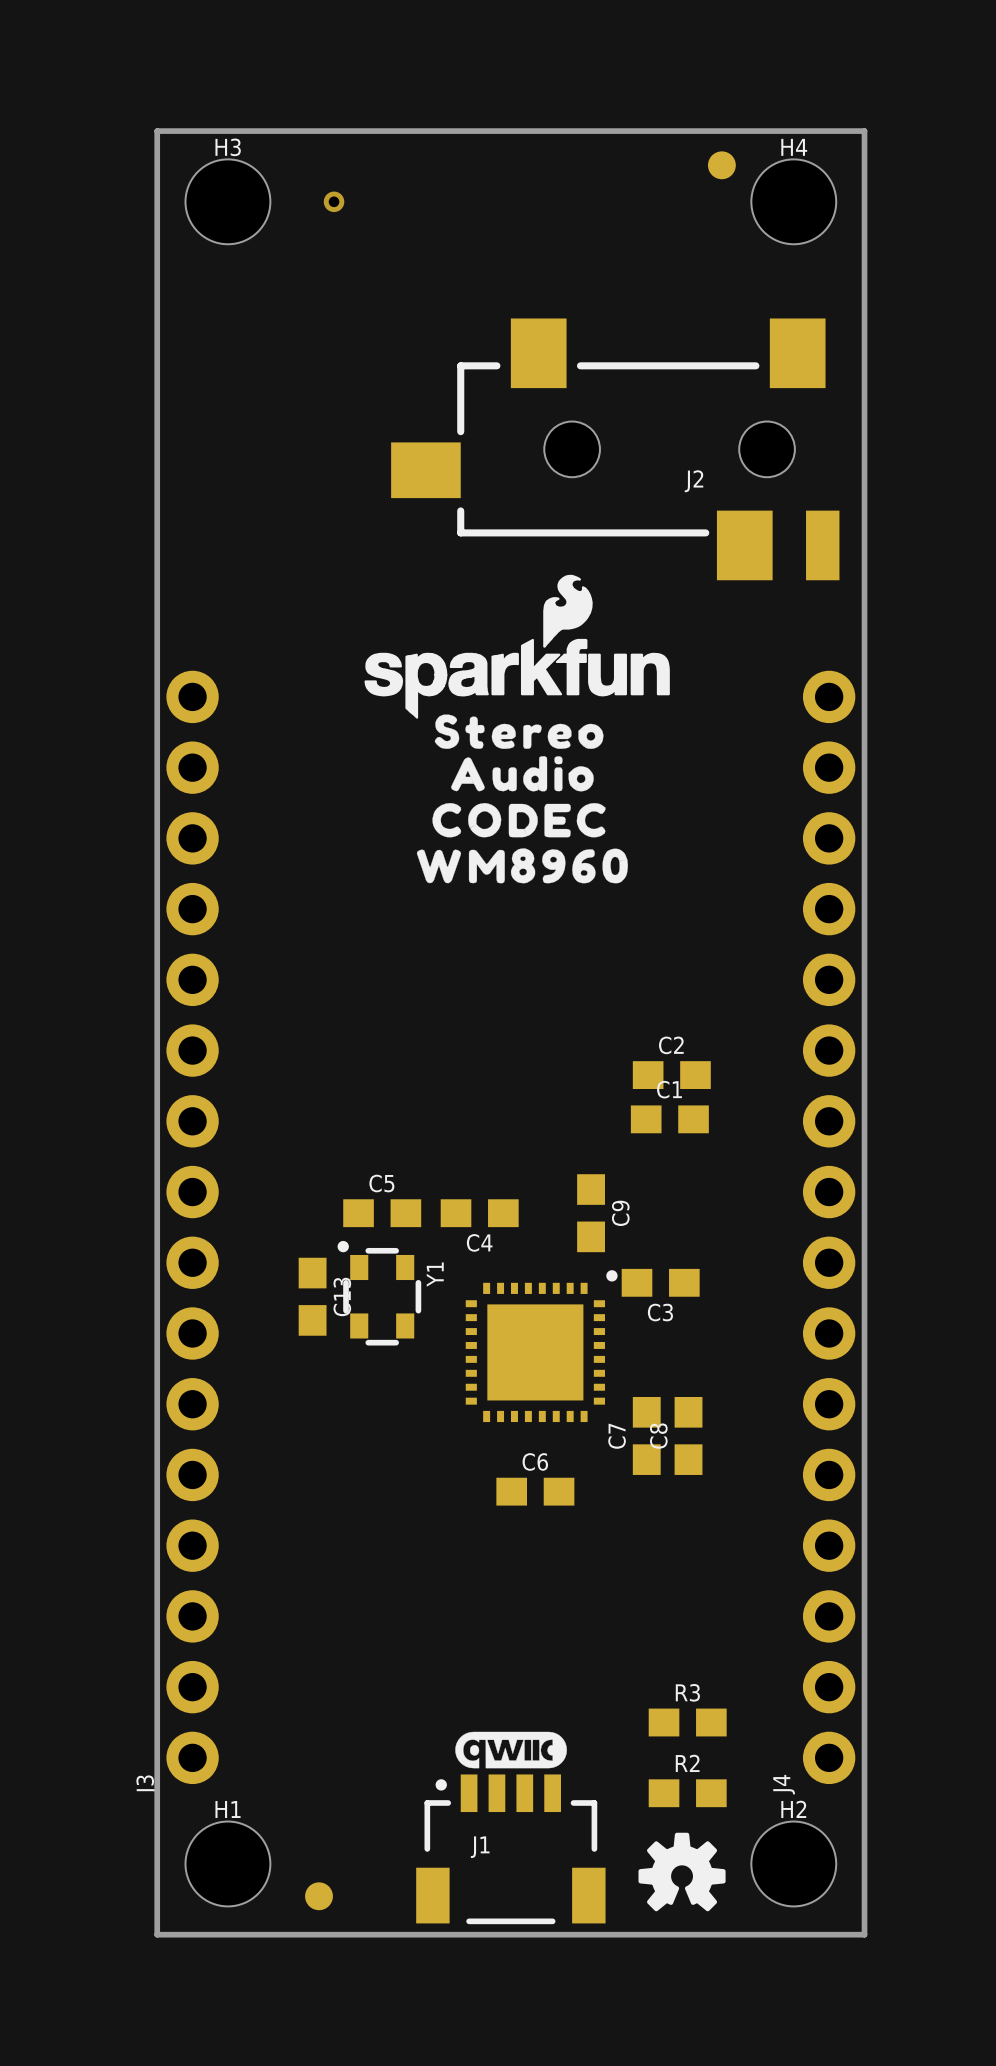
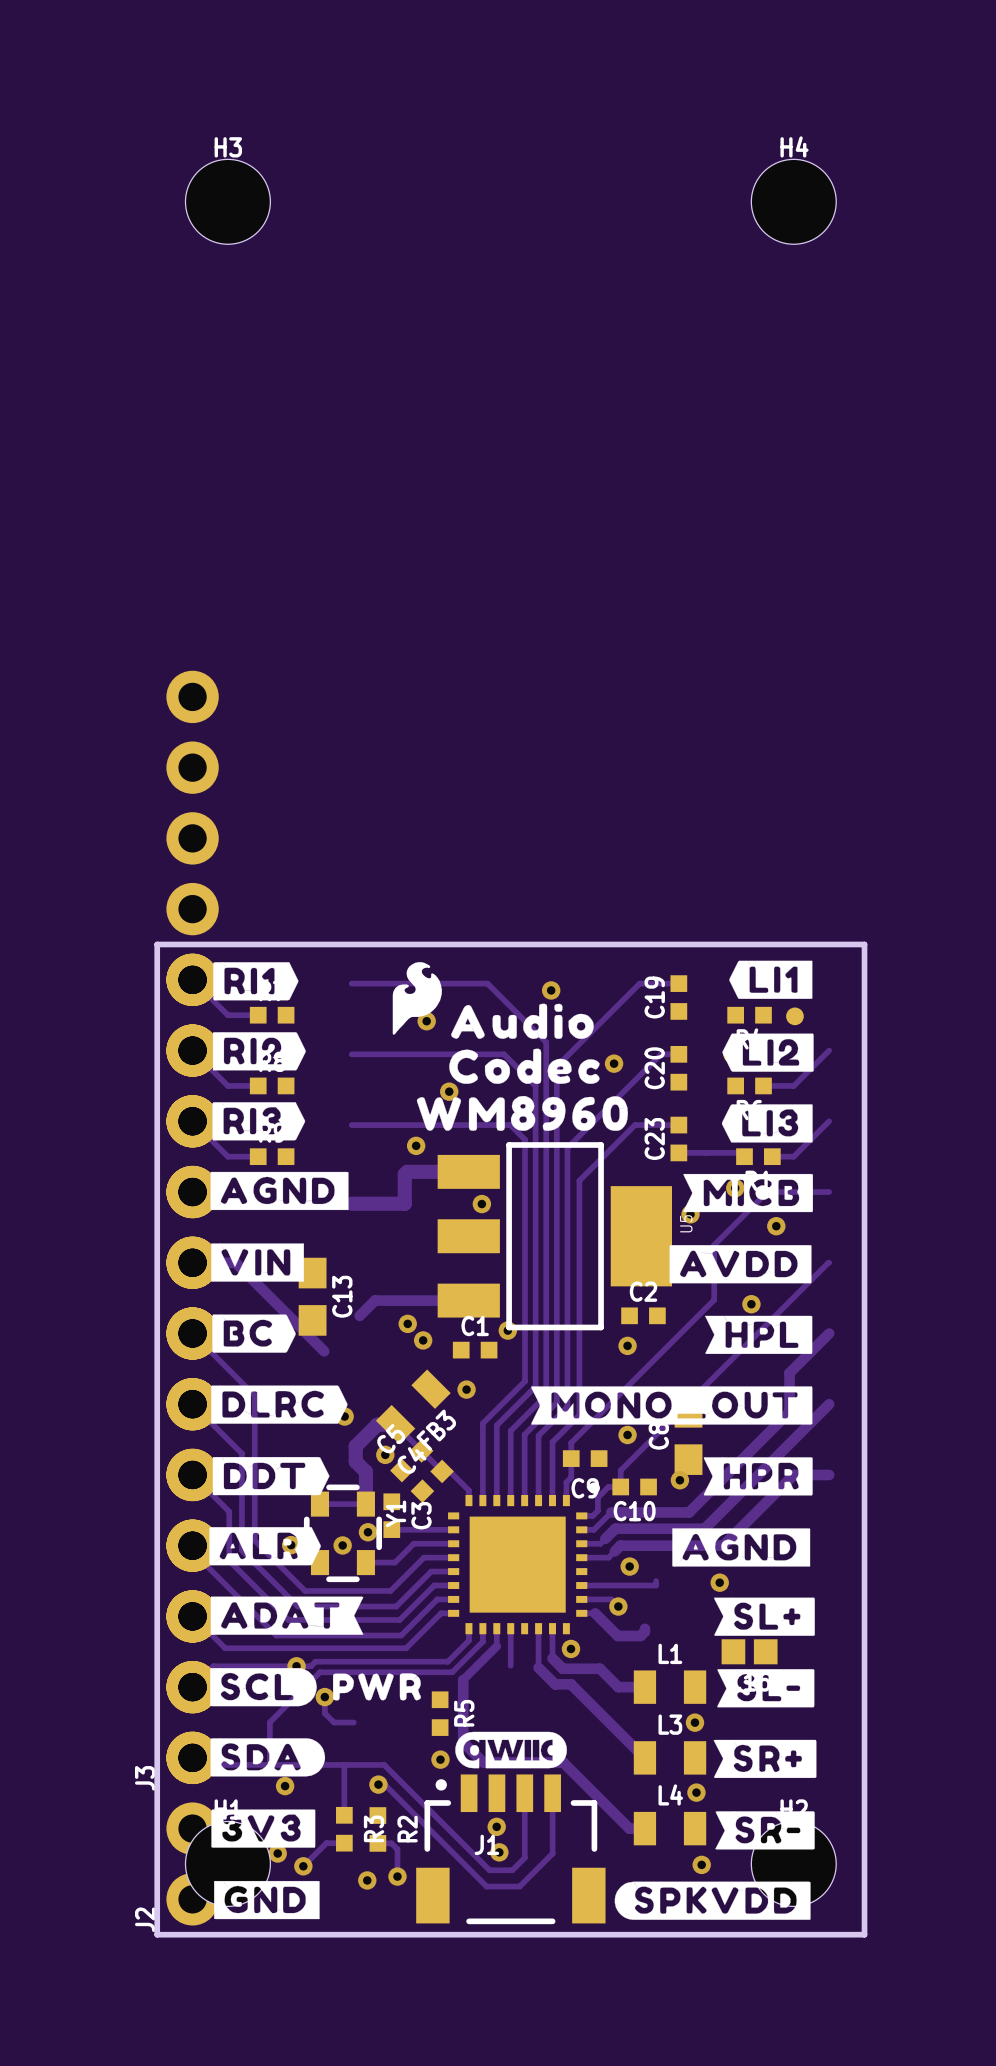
part: (721, 165) -> none
via: (334, 201) -> none
J2 footprint: [391, 318, 840, 581] -> [166, 953, 219, 1926]
J2 name position: J2 (694, 481) -> J2 (145, 1919)
drawing: [364, 574, 670, 749] -> none
drawing position: (522, 773) -> (522, 1021)
drawing: [432, 803, 606, 838] -> none
drawing position: (522, 865) -> (522, 1113)
board edge: (157, 944) (157, 131) (864, 131) (864, 944) -> (157, 944) (864, 944)
drawing: none -> [729, 960, 813, 999]
drawing: none -> [210, 962, 349, 1211]
drawing: none -> [392, 962, 600, 1084]
track: none -> (192, 979) (227, 1015) (258, 1015)
track: none -> (351, 983) (487, 983) (546, 1042) (546, 1395) (510, 1430) (510, 1500)
track: none -> (678, 983) (639, 983) (556, 1066) (556, 1402) (524, 1434) (524, 1500)
via: none -> (551, 990)
C19: none -> (678, 997)
part: none -> (272, 1015)
part: none -> (749, 1015)
part: none -> (794, 1016)
via: none -> (426, 1021)
drawing: none -> [531, 1033, 817, 1920]
track: none -> (192, 1050) (227, 1085) (258, 1085)
track: none -> (829, 1050) (793, 1085) (763, 1085)
track: none -> (351, 1054) (504, 1054) (535, 1085) (535, 1386) (496, 1425) (496, 1500)
track: none -> (678, 1054) (661, 1054) (567, 1147) (567, 1406) (538, 1435) (538, 1500)
C2 footprint: [632, 1061, 711, 1090] -> [621, 1307, 666, 1325]
via: none -> (614, 1063)
C20: none -> (678, 1068)
part: none -> (272, 1085)
part: none -> (749, 1085)
via: none -> (449, 1091)
C1 footprint: [630, 1105, 709, 1134] -> [452, 1341, 498, 1359]
track: none -> (192, 1121) (227, 1156) (258, 1156)
track: none -> (829, 1121) (793, 1156) (772, 1156)
track: none -> (351, 1125) (510, 1125) (525, 1139) (525, 1381) (482, 1423) (482, 1500)
track: none -> (678, 1125) (635, 1125) (579, 1180) (579, 1415) (552, 1442) (552, 1500)
C23: none -> (678, 1138)
via: none -> (416, 1145)
track: none -> (678, 1152) (740, 1152) (744, 1156)
part: none -> (272, 1156)
part: none -> (758, 1156)
track: none -> (468, 1171) (407, 1171) (404, 1174) (404, 1203) (351, 1203)
C9 footprint: [577, 1174, 605, 1253] -> [562, 1450, 608, 1467]
via: none -> (735, 1188)
track: none -> (829, 1192) (767, 1192) (714, 1245) (714, 1299) (571, 1442) (571, 1477) (566, 1482) (566, 1500)
C5 footprint: [343, 1199, 422, 1228] -> [390, 1439, 434, 1483]
C4 footprint: [440, 1199, 519, 1228] -> [410, 1459, 454, 1503]
via: none -> (481, 1204)
via: none -> (690, 1214)
via: none -> (776, 1226)
J4: (829, 1227) -> none
U5: none -> (554, 1236)
drawing: none -> [209, 1243, 421, 1920]
track: none -> (192, 1262) (235, 1262) (324, 1351)
track: none -> (829, 1262) (620, 1470) (620, 1486) (608, 1486) (597, 1497) (597, 1510) (592, 1515) (581, 1515)
C3 footprint: [621, 1268, 700, 1297] -> [383, 1493, 401, 1538]
Y1 position: (379, 1293) -> (340, 1529)
track: none -> (468, 1300) (374, 1300) (359, 1315)
via: none -> (751, 1304)
via: none -> (407, 1323)
via: none -> (507, 1330)
track: none -> (192, 1333) (254, 1395) (254, 1540) (305, 1590) (390, 1590) (423, 1557) (453, 1557)
track: none -> (829, 1333) (789, 1373) (789, 1412) (689, 1512) (611, 1512) (593, 1529) (581, 1529)
via: none -> (423, 1340)
via: none -> (627, 1345)
part position: (541, 1346) -> (523, 1558)
via: none -> (466, 1389)
track: none -> (192, 1404) (241, 1453) (241, 1550) (297, 1606) (396, 1606) (431, 1571) (453, 1571)
track: none -> (829, 1404) (704, 1528) (615, 1528) (600, 1543) (581, 1543)
FB3: none -> (413, 1406)
via: none -> (344, 1416)
track: none -> (395, 1424) (377, 1424) (355, 1446) (355, 1461) (365, 1471) (365, 1504) (319, 1504)
track: none -> (395, 1424) (442, 1471) (449, 1471) (468, 1490) (468, 1500)
via: none -> (627, 1434)
C7: (646, 1435) -> none
via: none -> (385, 1454)
track: none -> (192, 1474) (229, 1511) (229, 1560) (288, 1619) (399, 1619) (434, 1585) (453, 1585)
track: none -> (829, 1474) (793, 1474) (723, 1545) (620, 1545) (608, 1557) (581, 1557)
via: none -> (679, 1480)
C10: none -> (634, 1486)
C6: (535, 1491) -> none
track: none -> (391, 1529) (453, 1529)
via: none -> (367, 1532)
track: none -> (453, 1543) (413, 1543) (394, 1562) (365, 1562)
track: none -> (192, 1545) (192, 1551) (276, 1635) (401, 1635) (437, 1599) (453, 1599)
via: none -> (291, 1545)
via: none -> (342, 1545)
via: none -> (629, 1566)
track: none -> (656, 1581) (656, 1585) (581, 1585)
via: none -> (719, 1582)
track: none -> (581, 1599) (611, 1599) (618, 1606)
via: none -> (618, 1606)
track: none -> (453, 1613) (441, 1613) (406, 1648) (225, 1648) (192, 1616)
track: none -> (581, 1613) (595, 1613) (617, 1635) (640, 1635) (644, 1628)
track: none -> (468, 1628) (468, 1640) (447, 1661) (315, 1661) (310, 1666) (213, 1666) (192, 1687)
track: none -> (482, 1628) (482, 1641) (452, 1672) (319, 1672) (269, 1722) (269, 1764)
track: none -> (496, 1628) (496, 1646) (463, 1679) (463, 1742) (483, 1762) (563, 1762) (629, 1828) (644, 1828)
track: none -> (510, 1628) (510, 1665)
track: none -> (538, 1628) (538, 1667) (555, 1684) (570, 1684) (644, 1757)
track: none -> (552, 1628) (552, 1658) (562, 1668) (599, 1668) (618, 1687) (644, 1687)
via: none -> (570, 1648)
part: none -> (749, 1651)
via: none -> (296, 1666)
L1: none -> (670, 1687)
track: none -> (324, 1697) (324, 1713) (334, 1722) (353, 1722)
via: none -> (324, 1697)
R3 footprint: [648, 1708, 727, 1737] -> [336, 1806, 353, 1852]
R5: none -> (440, 1713)
via: none -> (694, 1722)
track: none -> (192, 1757) (199, 1764) (384, 1764) (489, 1870) (512, 1870) (524, 1857) (524, 1793)
L3: none -> (670, 1757)
via: none -> (440, 1759)
track: none -> (344, 1764) (344, 1815)
R2 footprint: [648, 1779, 727, 1808] -> [369, 1807, 387, 1852]
track: none -> (378, 1784) (384, 1784) (486, 1886) (519, 1886) (552, 1853) (552, 1793)
via: none -> (378, 1784)
via: none -> (285, 1786)
via: none -> (696, 1792)
via: none -> (496, 1826)
L4: none -> (670, 1828)
drawing: [638, 1832, 726, 1912] -> none
track: none -> (344, 1843) (326, 1843) (303, 1866)
track: none -> (377, 1843) (391, 1843) (397, 1849) (397, 1876)
via: none -> (499, 1852)
via: none -> (277, 1853)
via: none -> (701, 1864)
via: none -> (303, 1866)
via: none -> (397, 1876)
via: none -> (367, 1880)
part: (319, 1896) -> none

